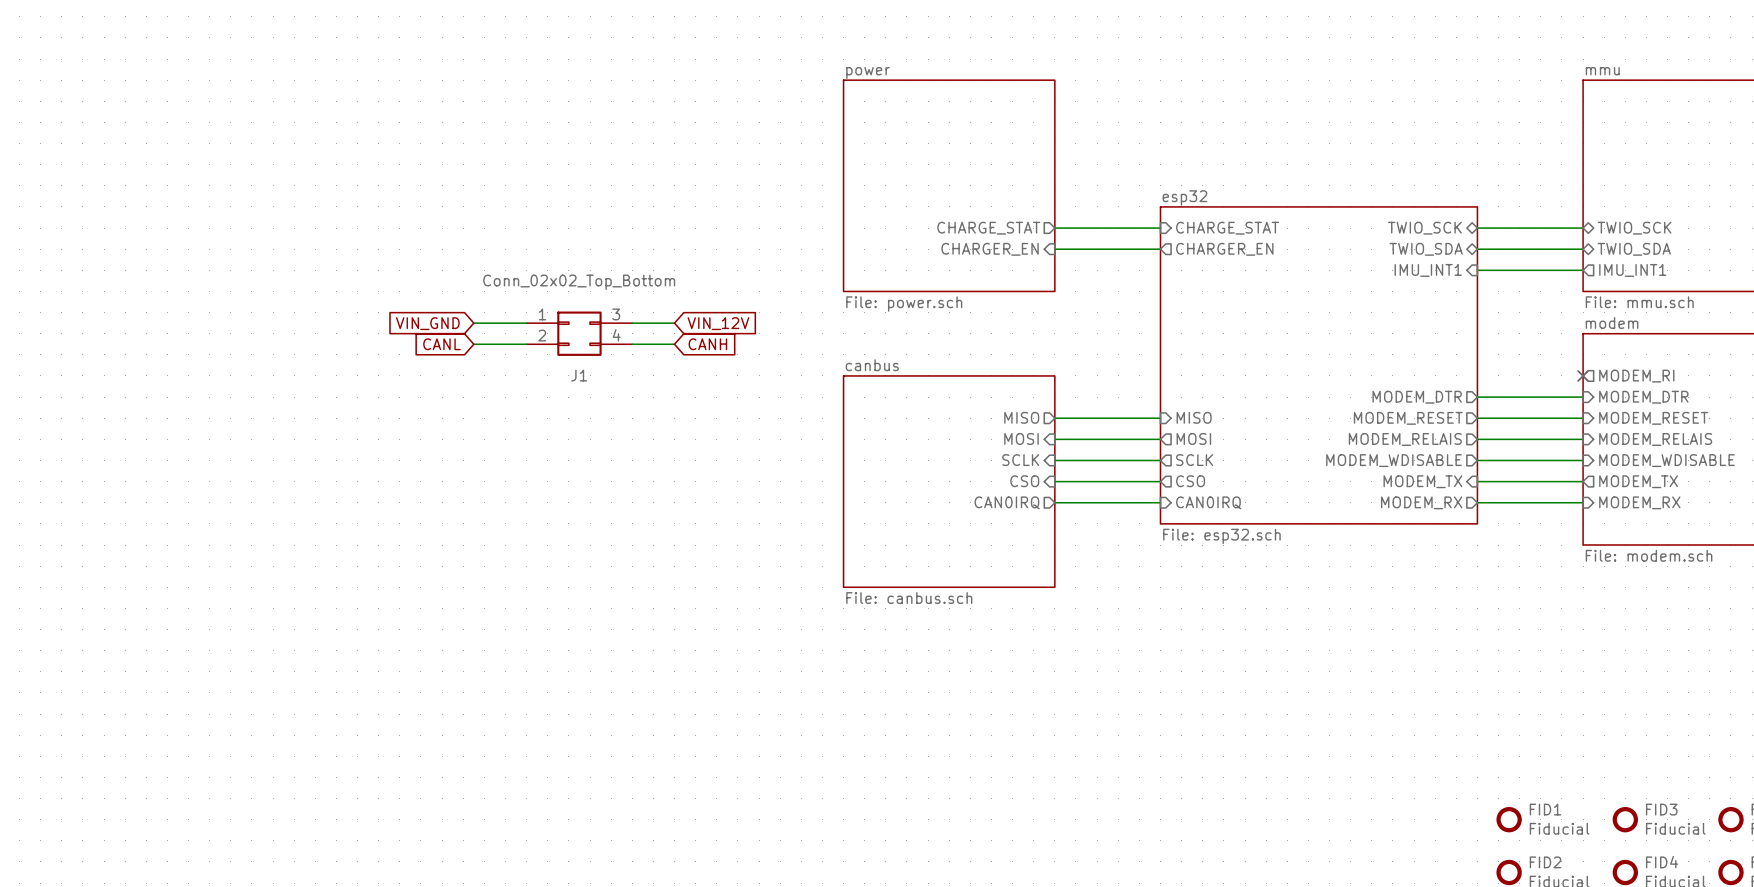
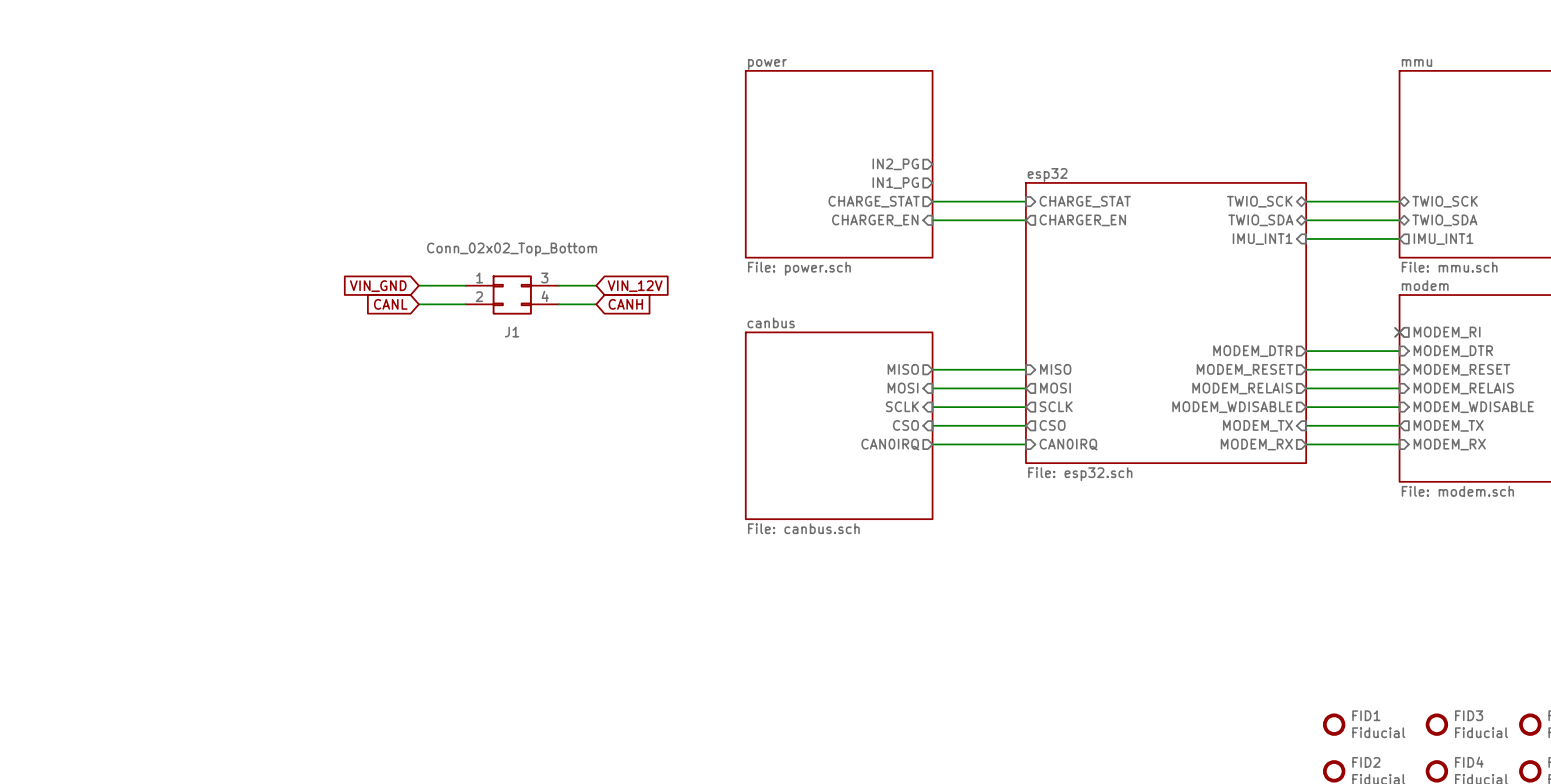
sheet pin: none -> IN2_PG (895, 164)
sheet pin: none -> IN1_PG (895, 183)

